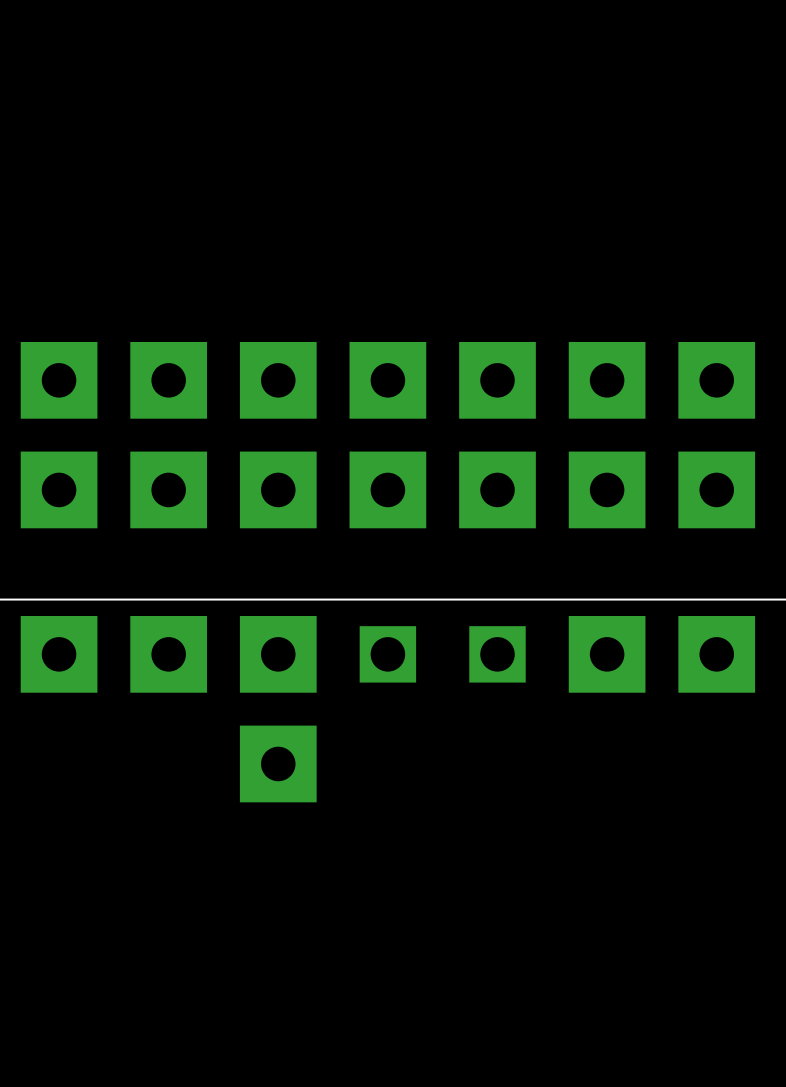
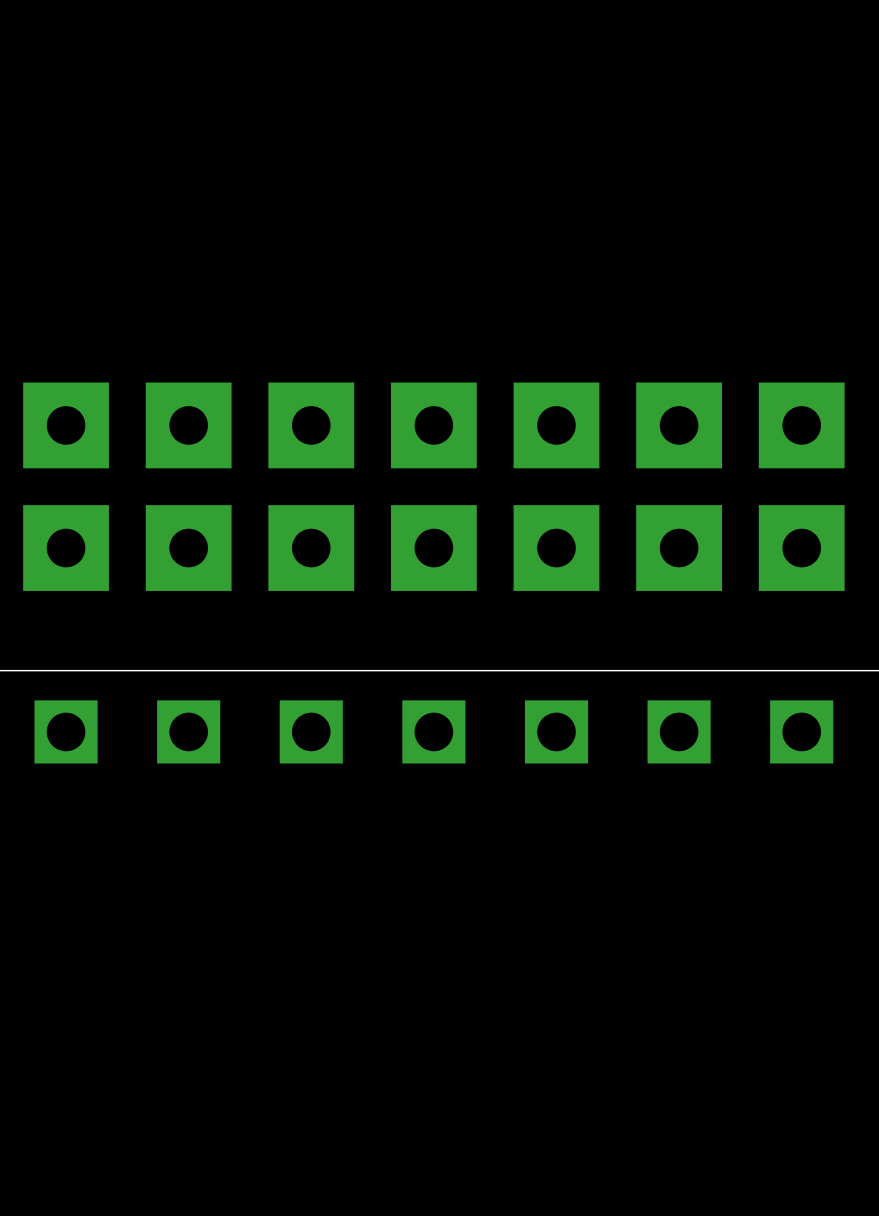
part footprint: [568, 616, 646, 693] -> [524, 700, 834, 764]
part: (59, 654) -> none
part: none -> (127, 731)
part: (168, 654) -> none
part: (278, 654) -> none
part position: (442, 654) -> (372, 731)
part: (716, 654) -> none
part: (278, 763) -> none

